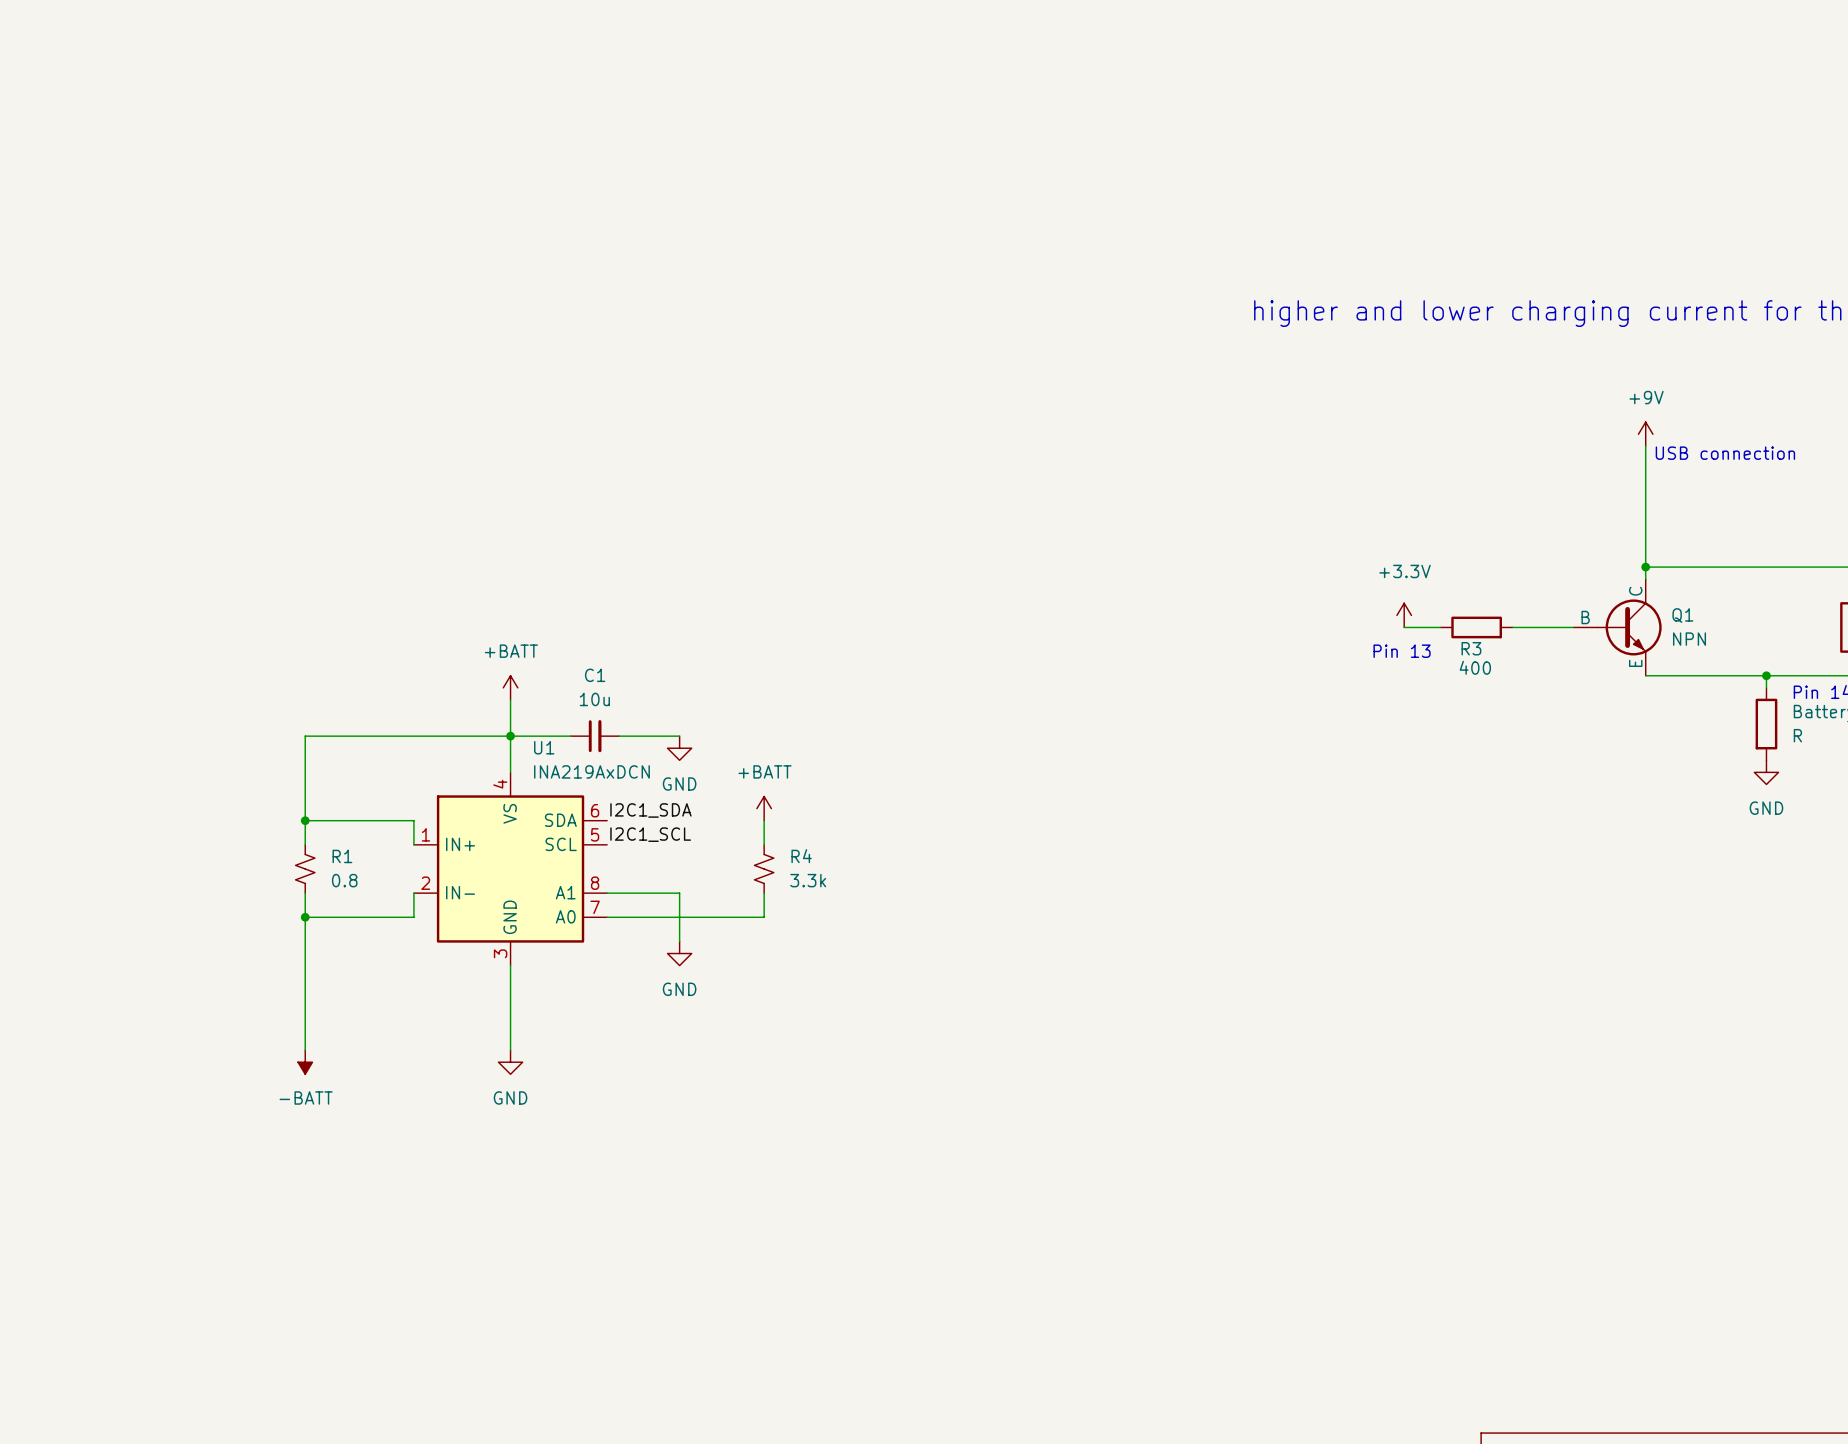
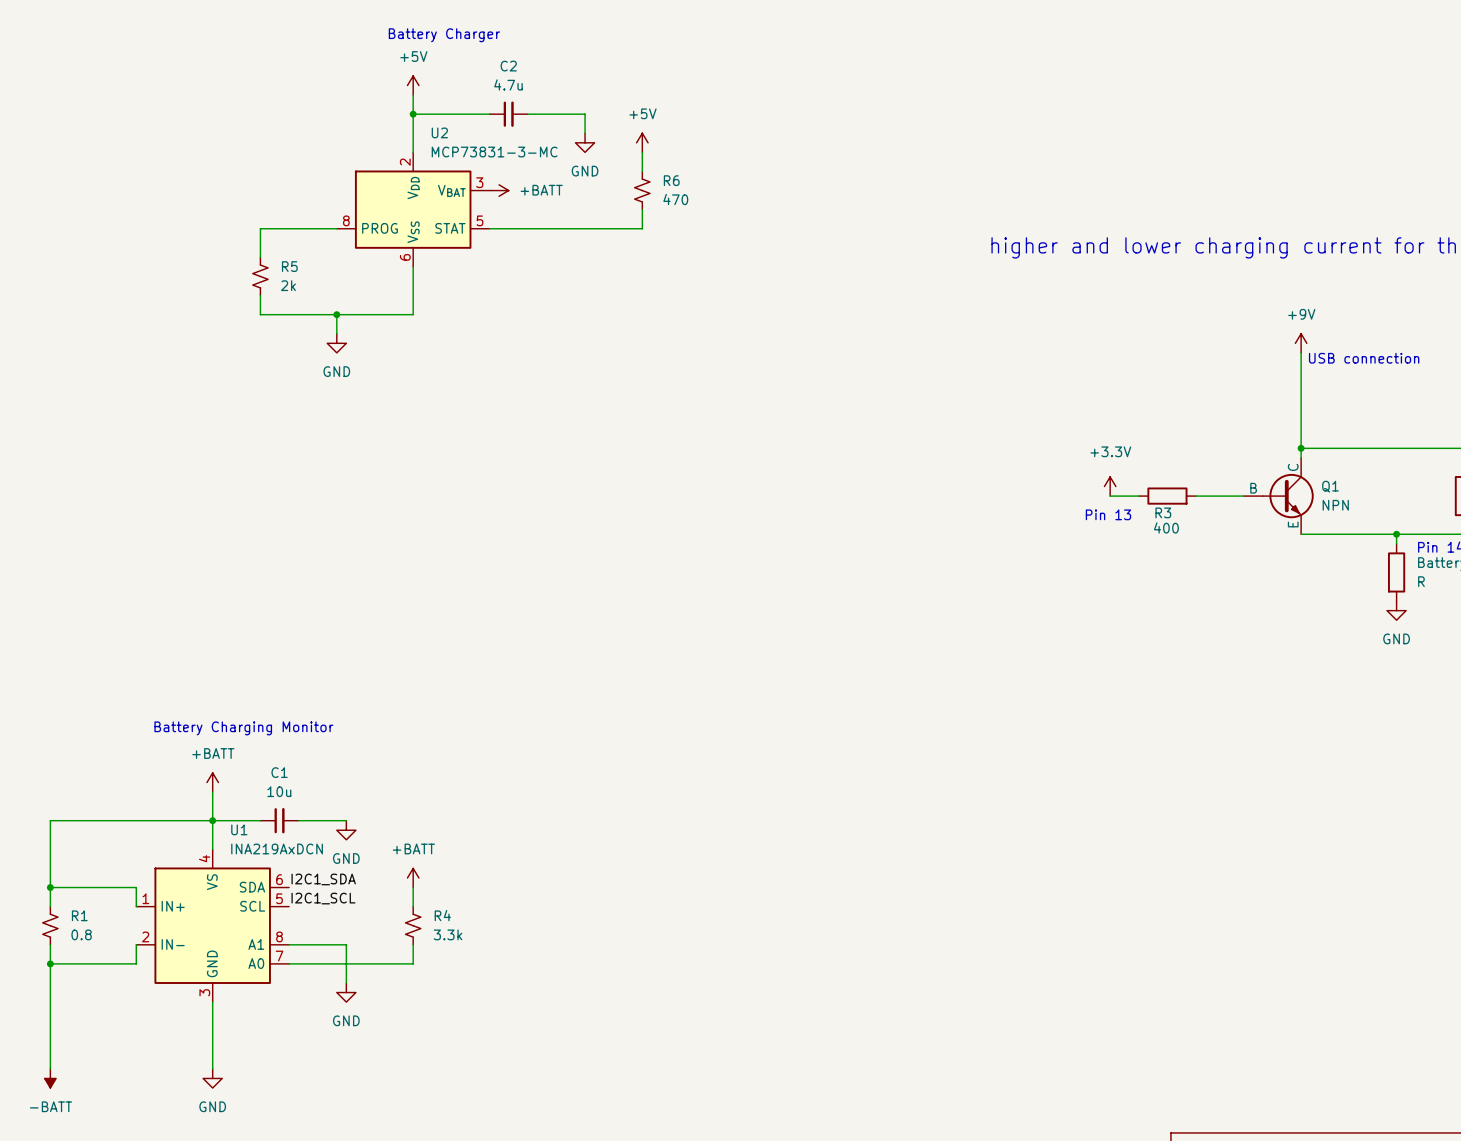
text: none -> Battery Charger (444, 35)
power symbol: none -> +5V (413, 85)
wire: none -> (413, 95) (413, 152)
wire: none -> (413, 114) (489, 114)
junction: none -> (413, 114)
C2: none -> 4.7u (508, 114)
wire: none -> (527, 114) (585, 114) (585, 133)
power symbol: none -> GND (585, 142)
power symbol: none -> +5V (642, 142)
wire: none -> (642, 152) (642, 171)
power symbol: none -> +BATT (499, 190)
R6: none -> 470 (642, 190)
U2: none -> MCP73831-3-MC (413, 209)
wire: none -> (642, 209) (642, 228) (489, 228)
wire: none -> (336, 228) (260, 228) (260, 257)
wire: none -> (413, 266) (413, 314) (260, 314) (260, 295)
R5: none -> 2k (260, 276)
wire: none -> (336, 314) (336, 333)
junction: none -> (336, 314)
power symbol: none -> GND (336, 343)
power symbol: +BATT (510, 687) -> none
wire: (510, 699) (510, 772) -> none
junction: (510, 736) -> none
wire: (570, 736) (305, 736) (305, 844) -> none
C1 position: (595, 736) -> (279, 820)
wire: (619, 736) (679, 736) -> none
power symbol: GND (679, 748) -> none
power symbol: +BATT (764, 808) -> none
label: I2C1_SDA (650, 810) -> none
wire: (305, 820) (413, 820) (413, 844) -> none
junction: (305, 820) -> none
wire: (764, 820) (764, 844) -> none
label: I2C1_SCL (650, 834) -> none
R1 position: (305, 868) -> (50, 925)
U1 position: (510, 868) -> (212, 925)
R4 position: (764, 868) -> (413, 925)
wire: (305, 893) (305, 1050) -> none
wire: (413, 893) (413, 917) (305, 917) -> none
wire: (607, 893) (679, 893) (679, 941) -> none
wire: (764, 893) (764, 917) (607, 917) -> none
junction: (305, 917) -> none
text: none -> Battery Charging Monitor (243, 728)
power symbol: GND (679, 953) -> none
wire: (510, 965) (510, 1050) -> none
power symbol: none -> +BATT (212, 782)
wire: none -> (212, 792) (212, 849)
junction: none -> (212, 820)
wire: none -> (260, 820) (50, 820) (50, 906)
wire: none -> (298, 820) (346, 820)
power symbol: -BATT (305, 1062) -> none
power symbol position: GND (510, 1062) -> GND (346, 830)
power symbol: none -> +BATT (413, 877)
label: none -> I2C1_SDA (323, 879)
wire: none -> (50, 887) (136, 887) (136, 906)
junction: none -> (50, 887)
wire: none -> (413, 887) (413, 906)
label: none -> I2C1_SCL (323, 898)
wire: none -> (50, 944) (50, 1068)
wire: none -> (136, 944) (136, 963) (50, 963)
wire: none -> (289, 944) (346, 944) (346, 983)
wire: none -> (413, 944) (413, 963) (289, 963)
junction: none -> (50, 963)
power symbol: none -> GND (346, 992)
wire: none -> (212, 1002) (212, 1068)
power symbol: none -> -BATT (50, 1078)
power symbol: none -> GND (212, 1078)

